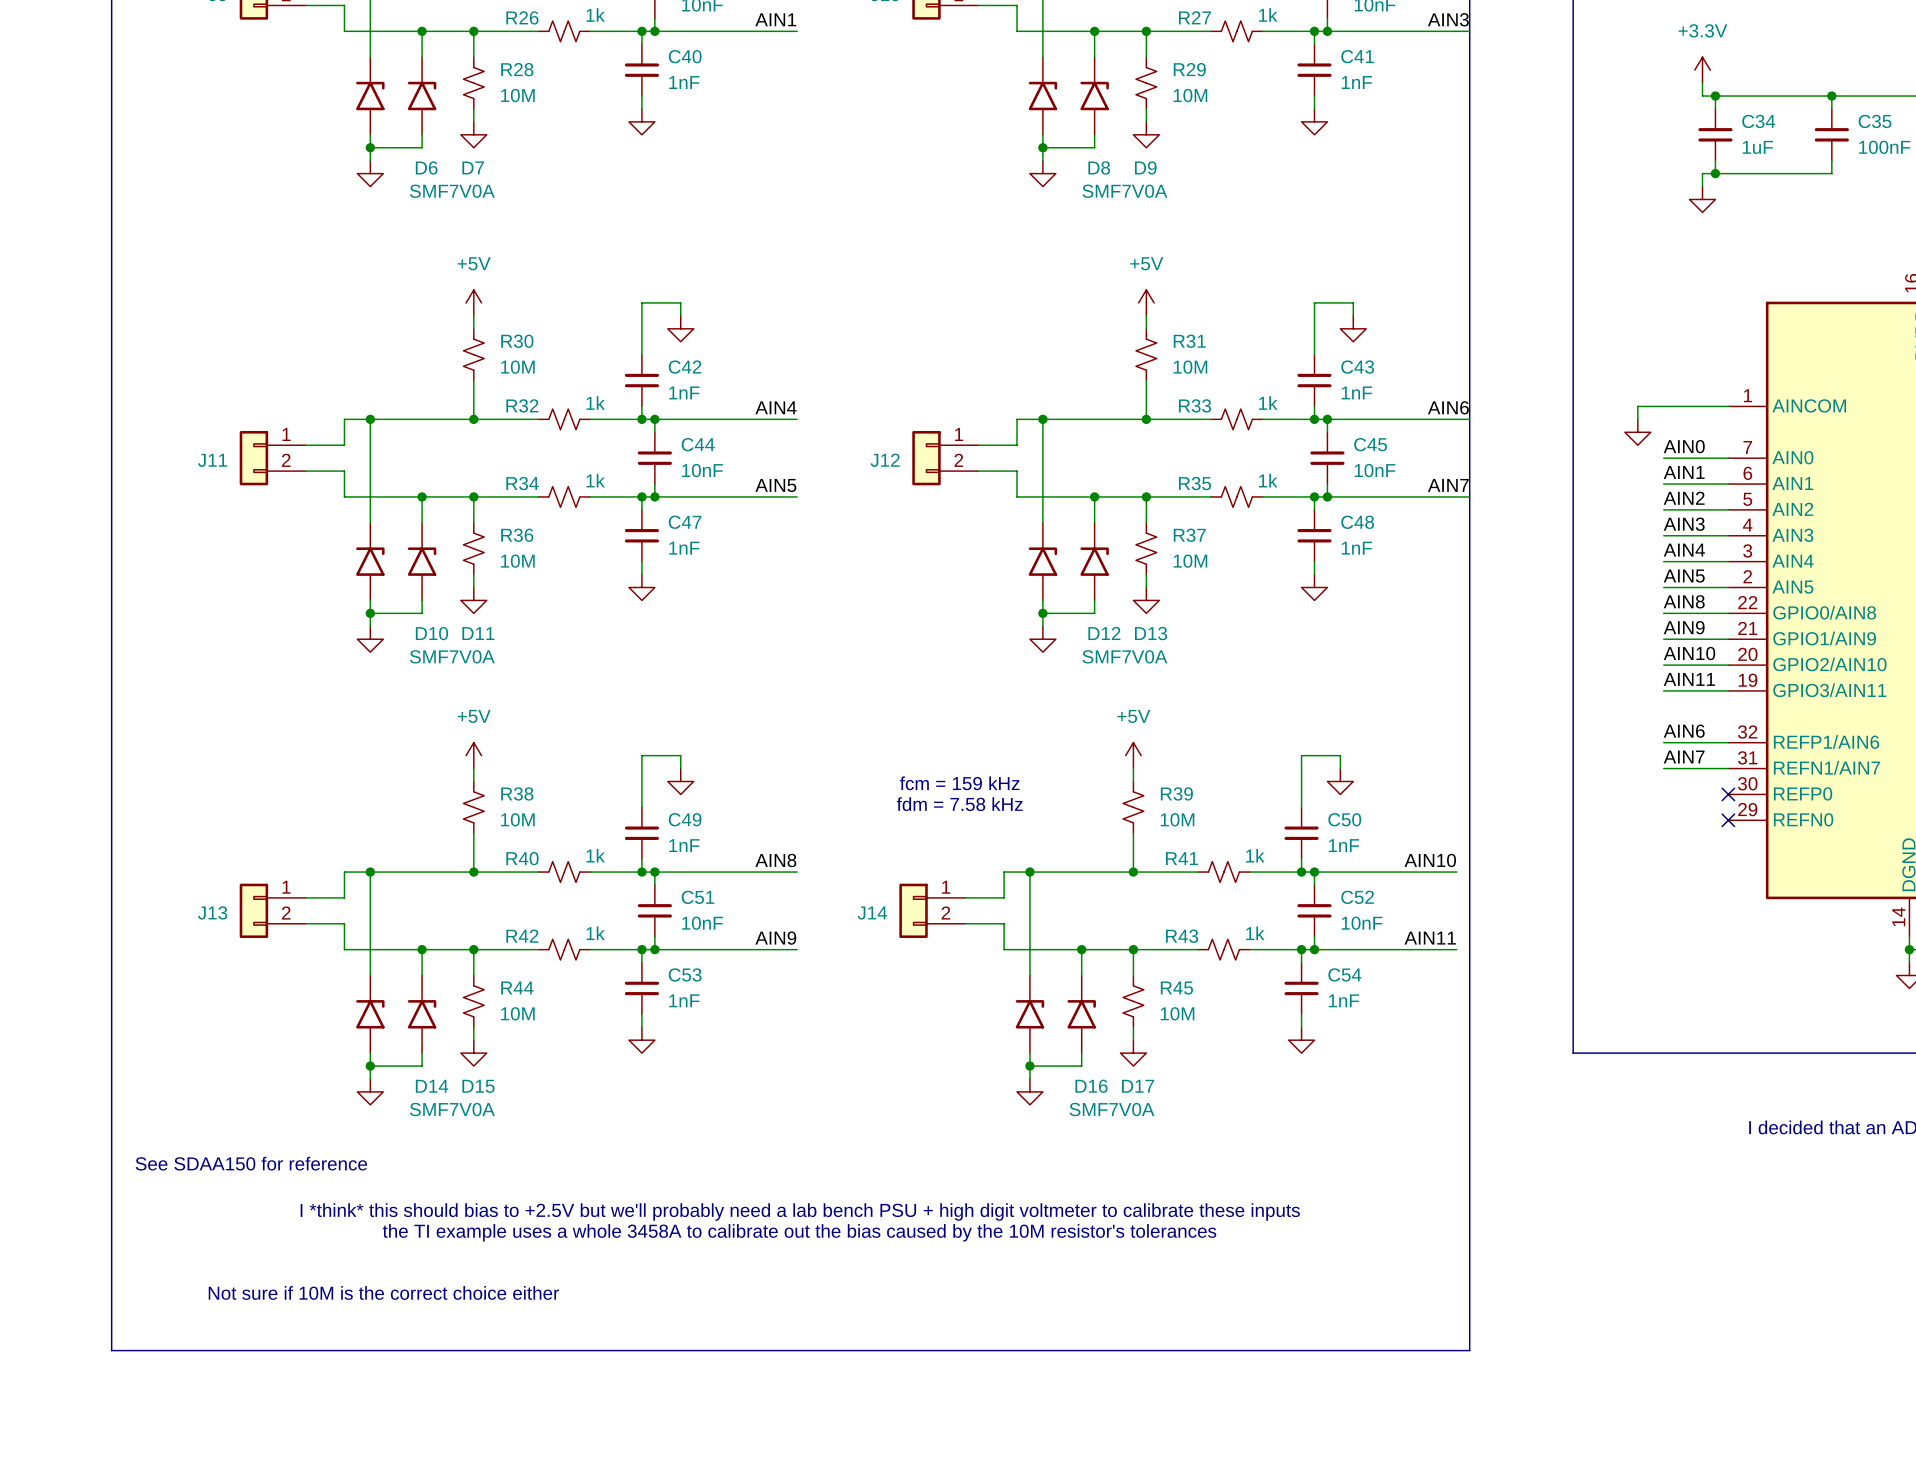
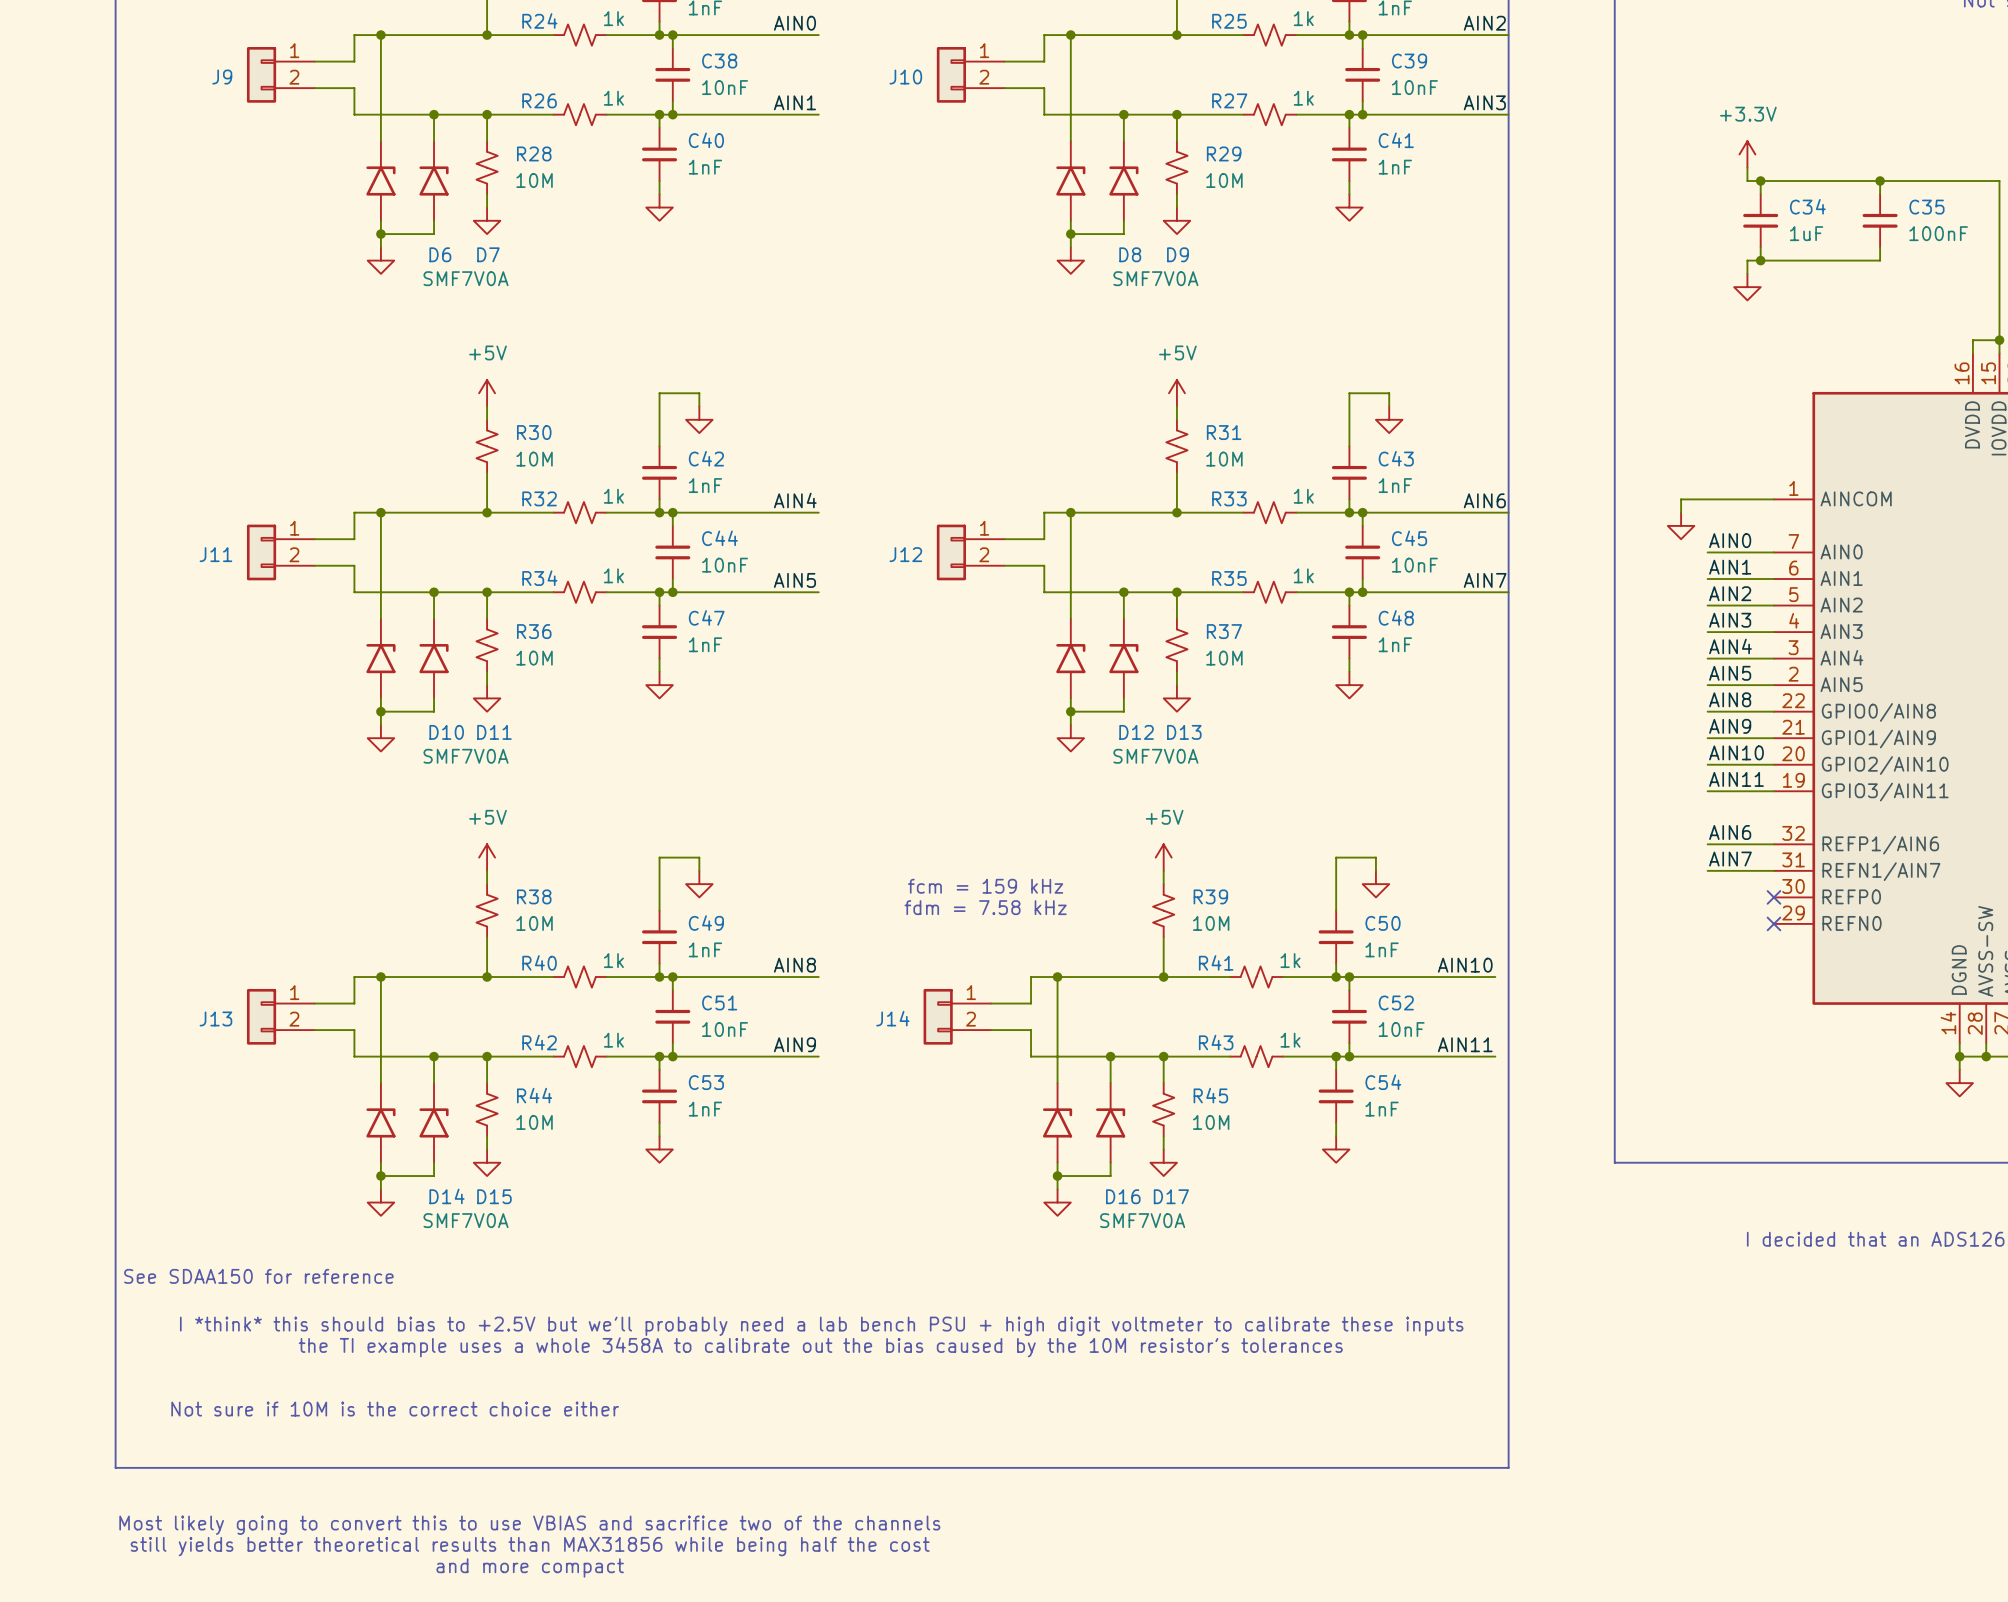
text: none -> Most likely going to convert this to use VBIAS and sacrifice two of the channels (529, 1525)
text: none -> still yields better theoretical results than MAX31856 while being half the cost (530, 1546)
text: none -> and more compact (530, 1567)

